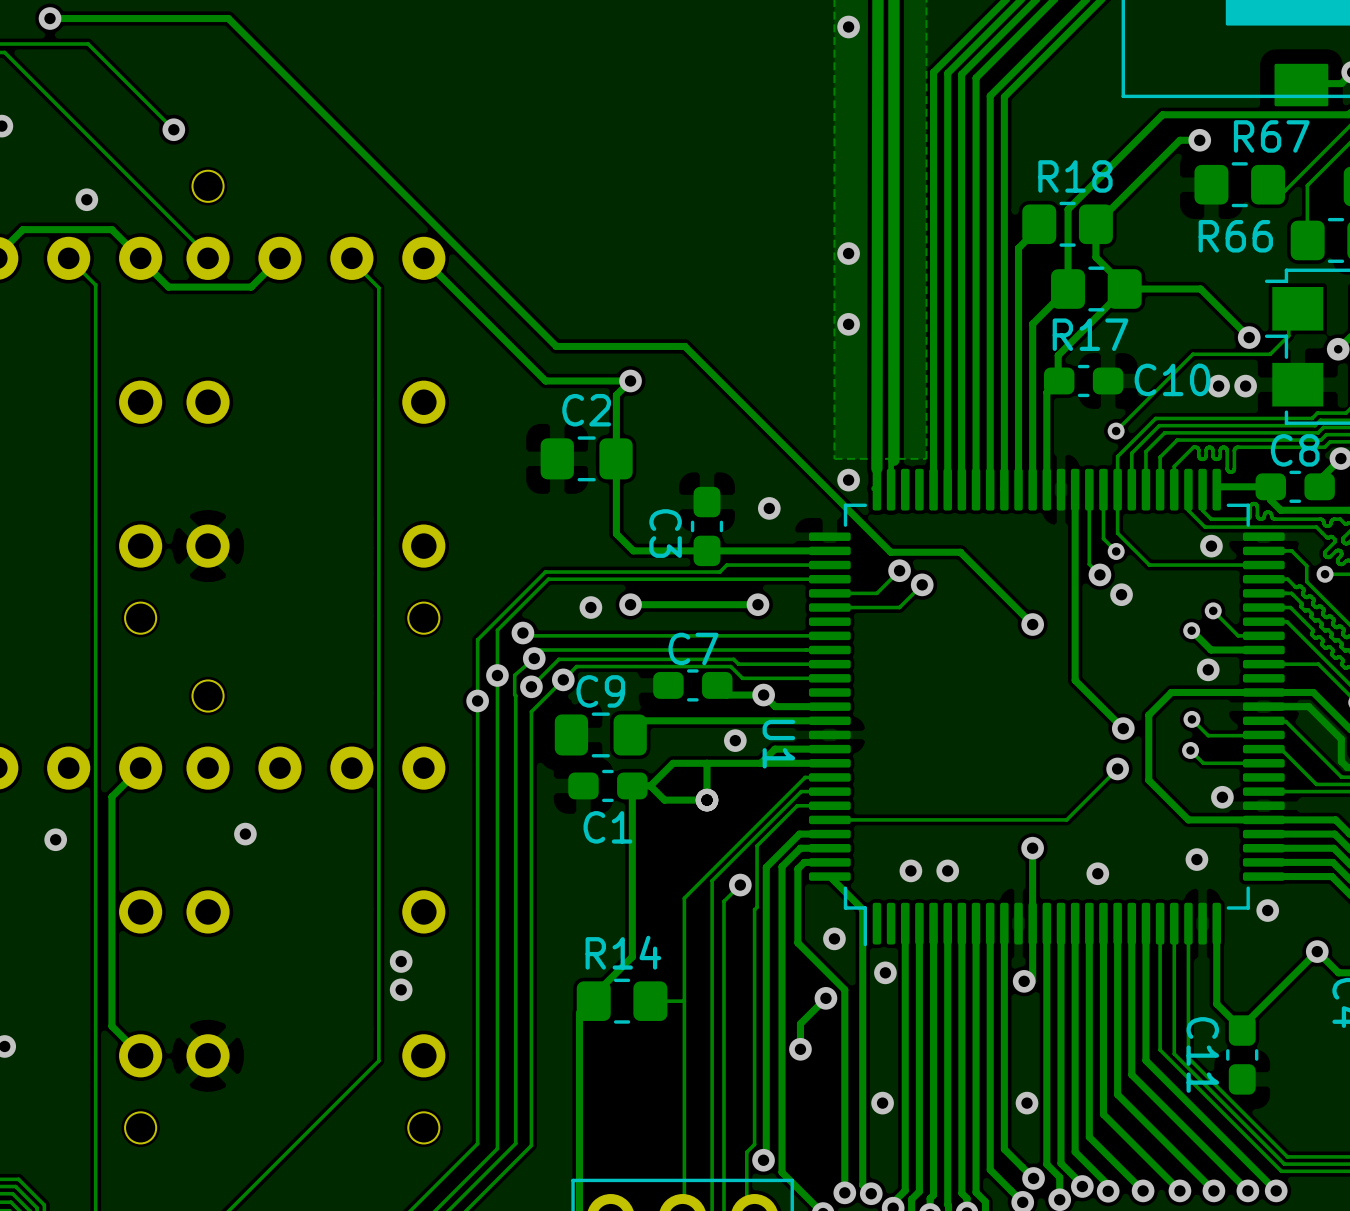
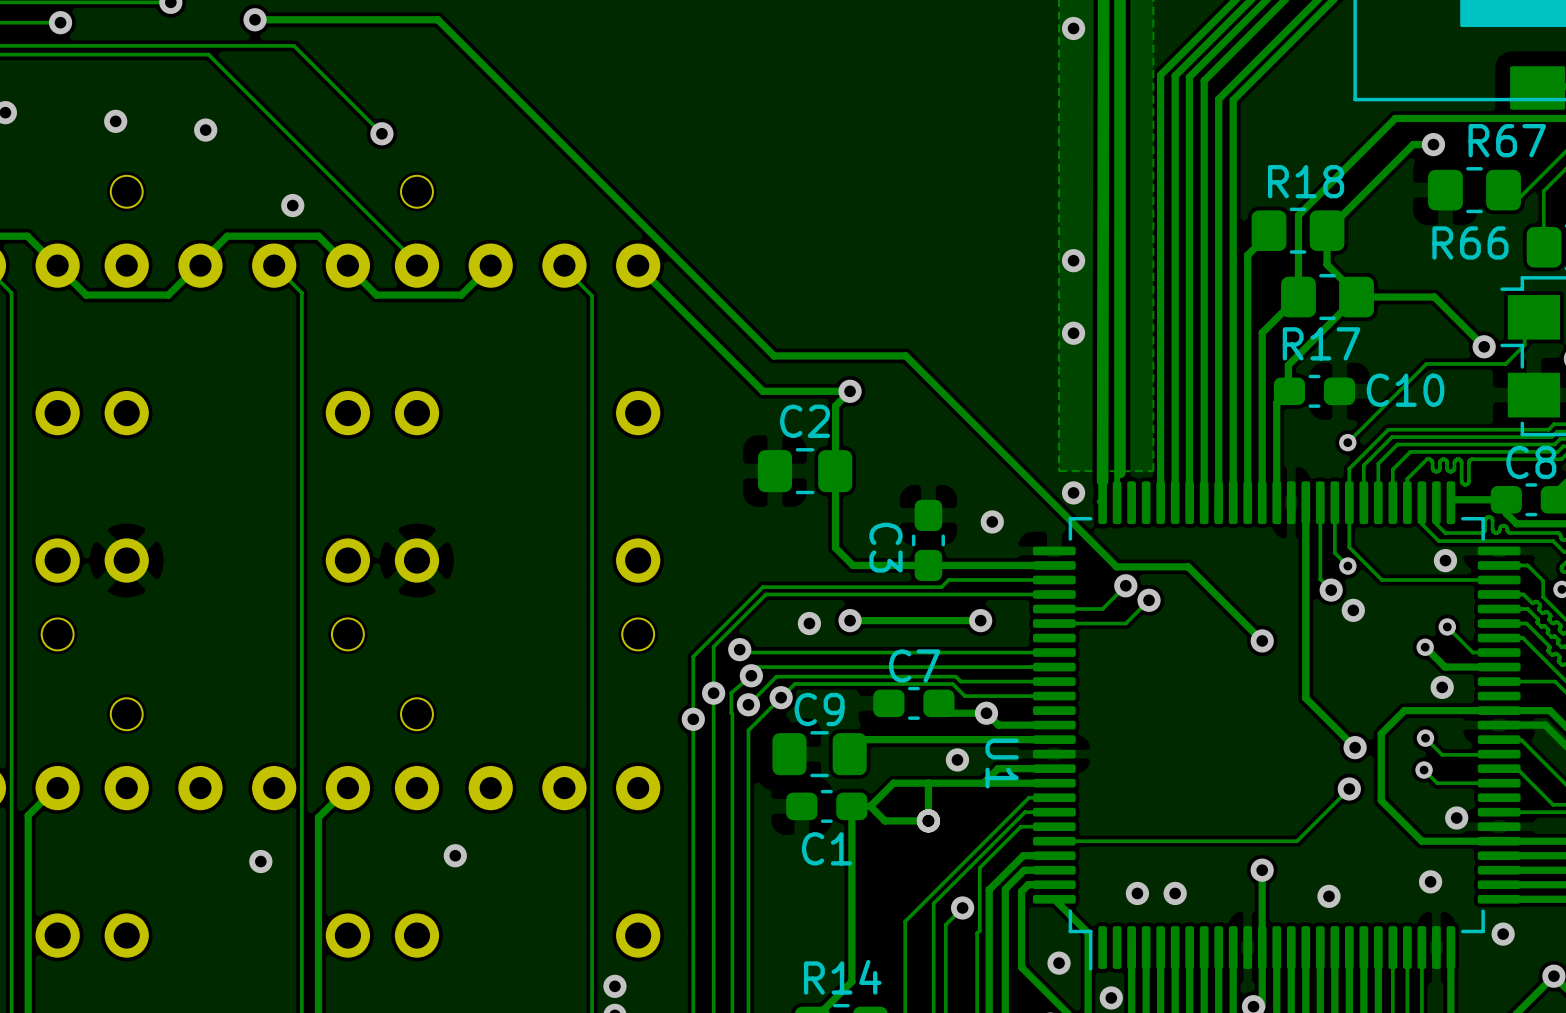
via: (1218, 386) -> none
via: (1245, 386) -> none

